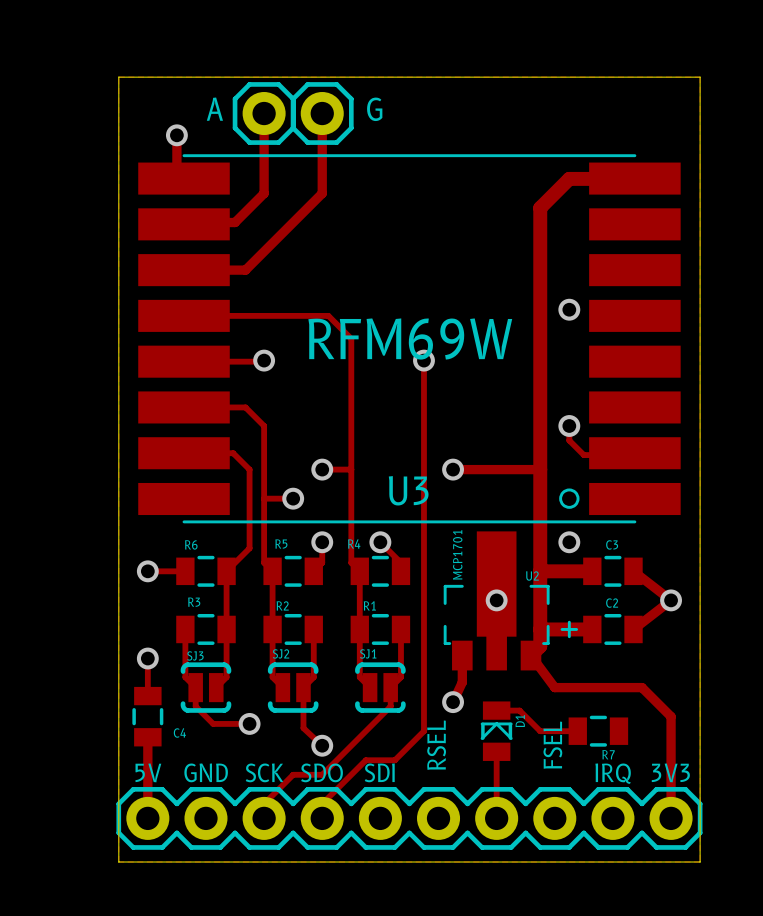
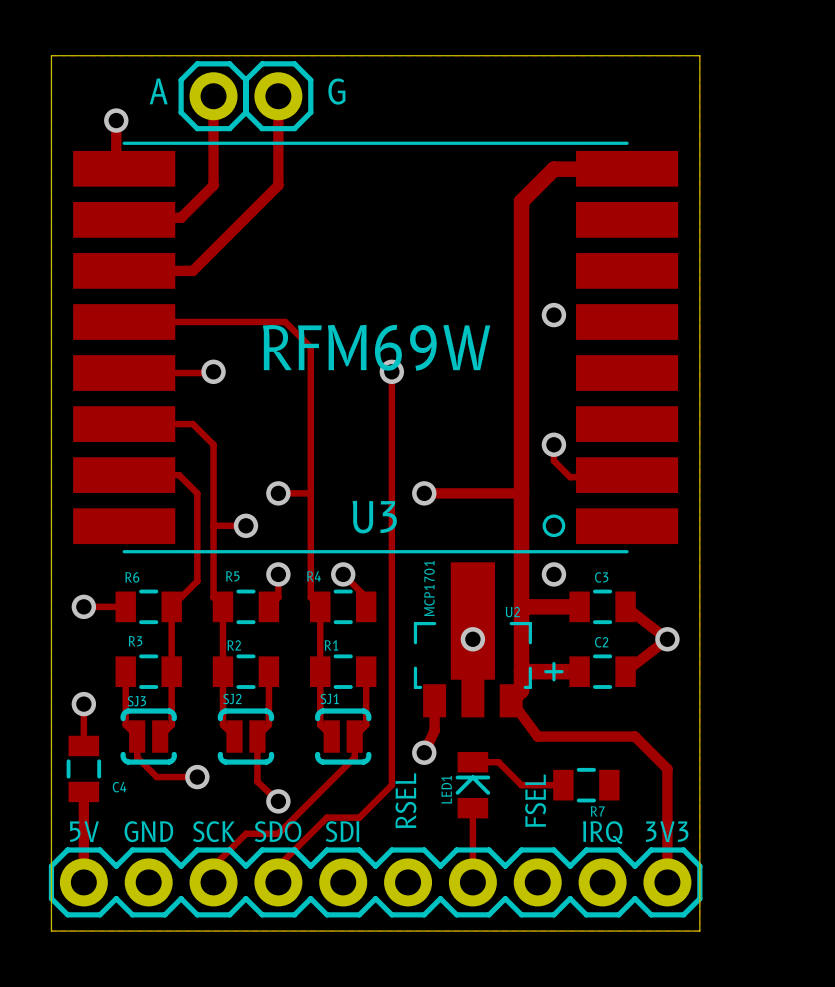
line: (482, 723) (511, 723) -> none
D1: (496, 731) -> none
LED1: none -> (472, 785)
line: (482, 738) (496, 723) (511, 738) -> none

